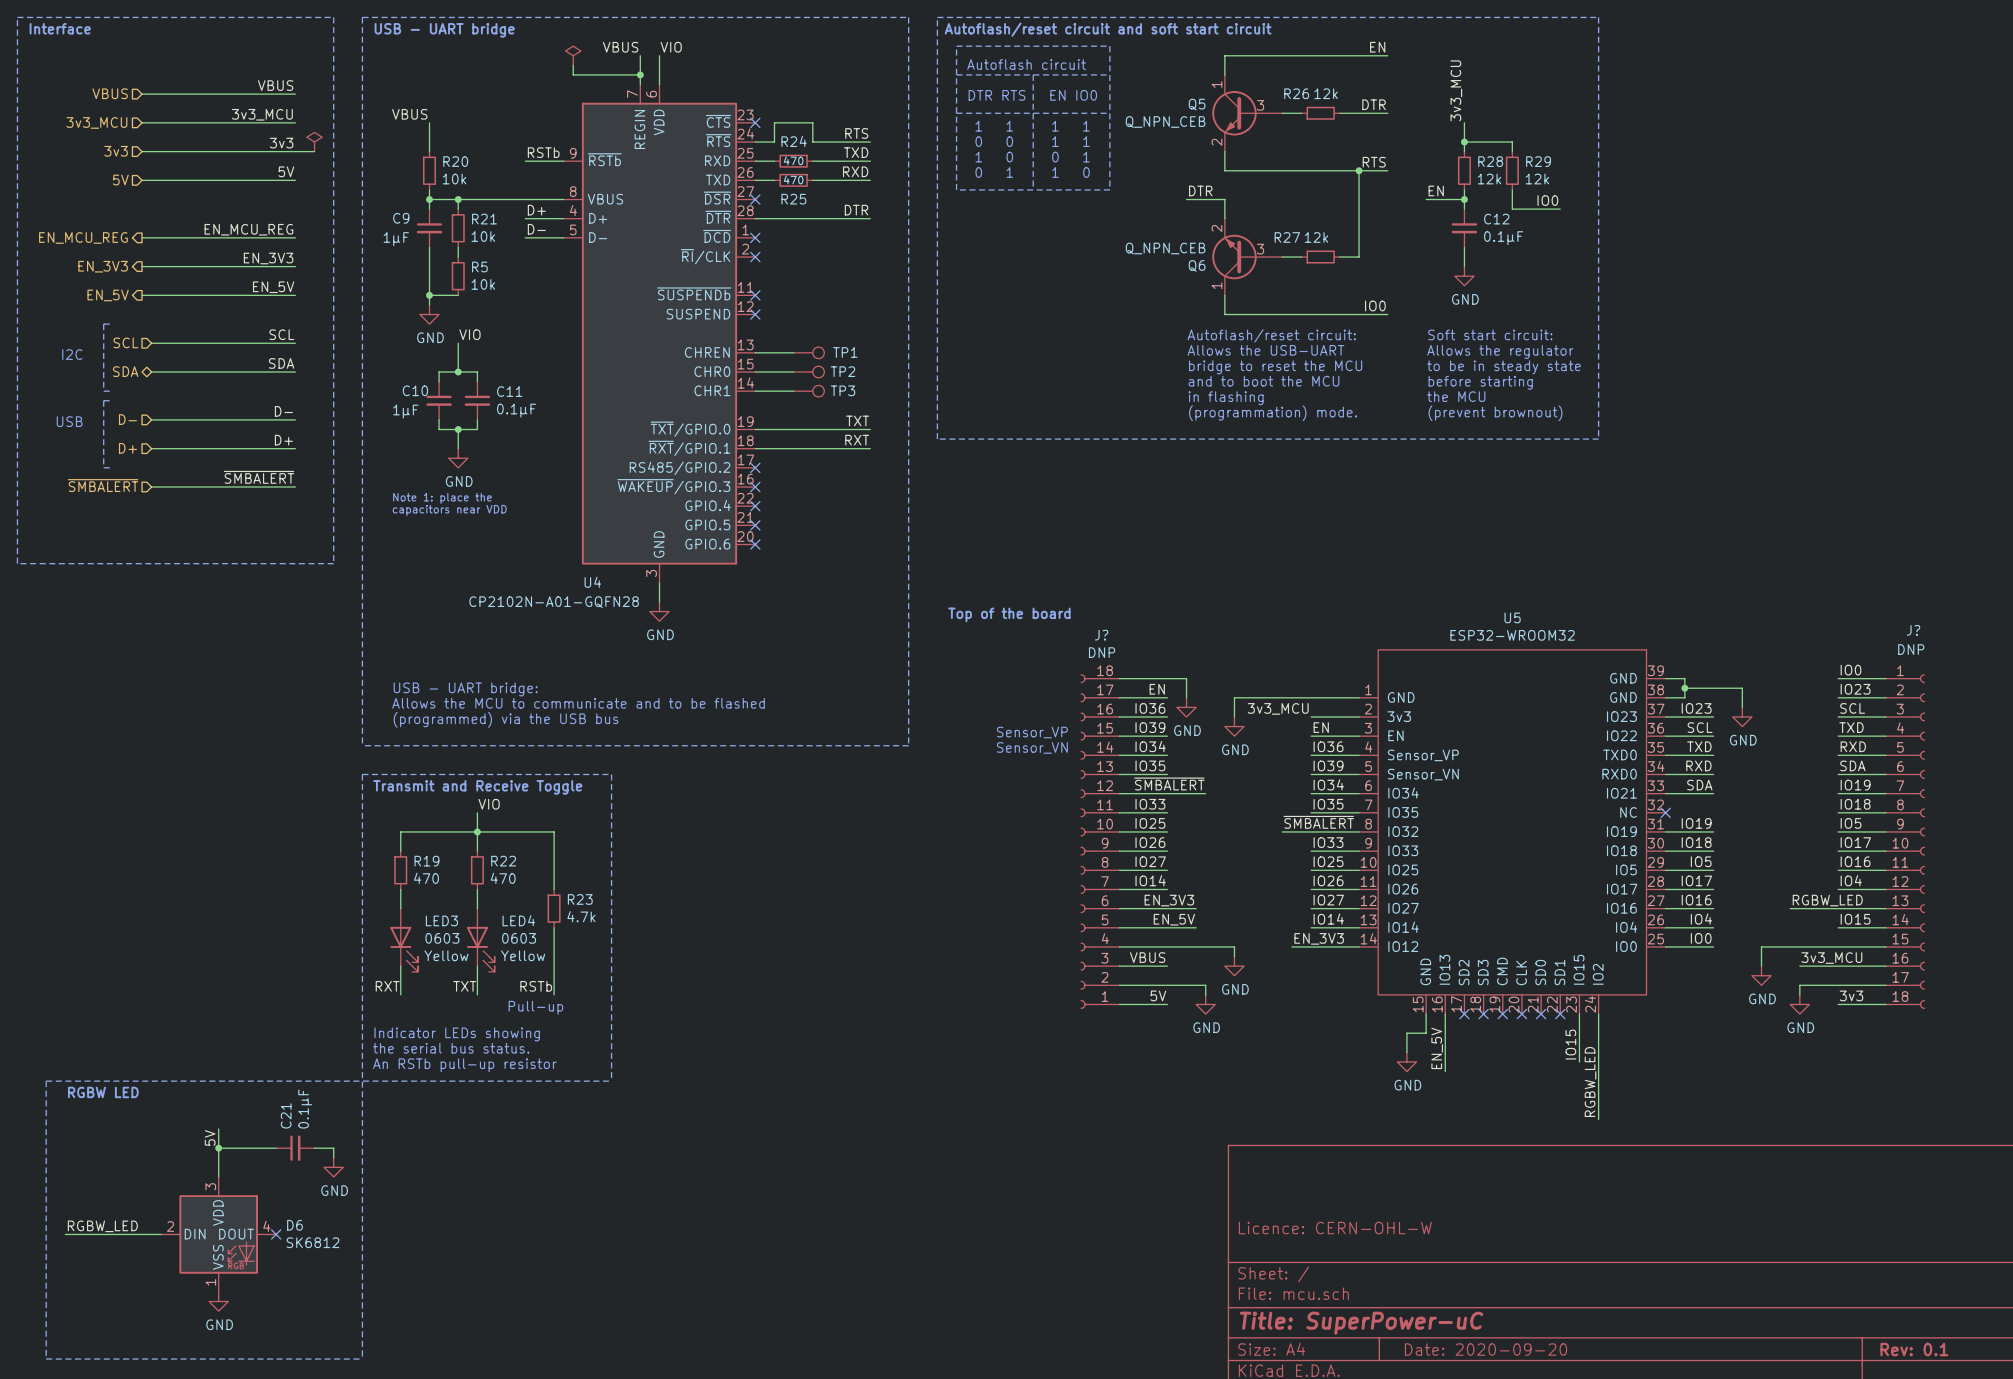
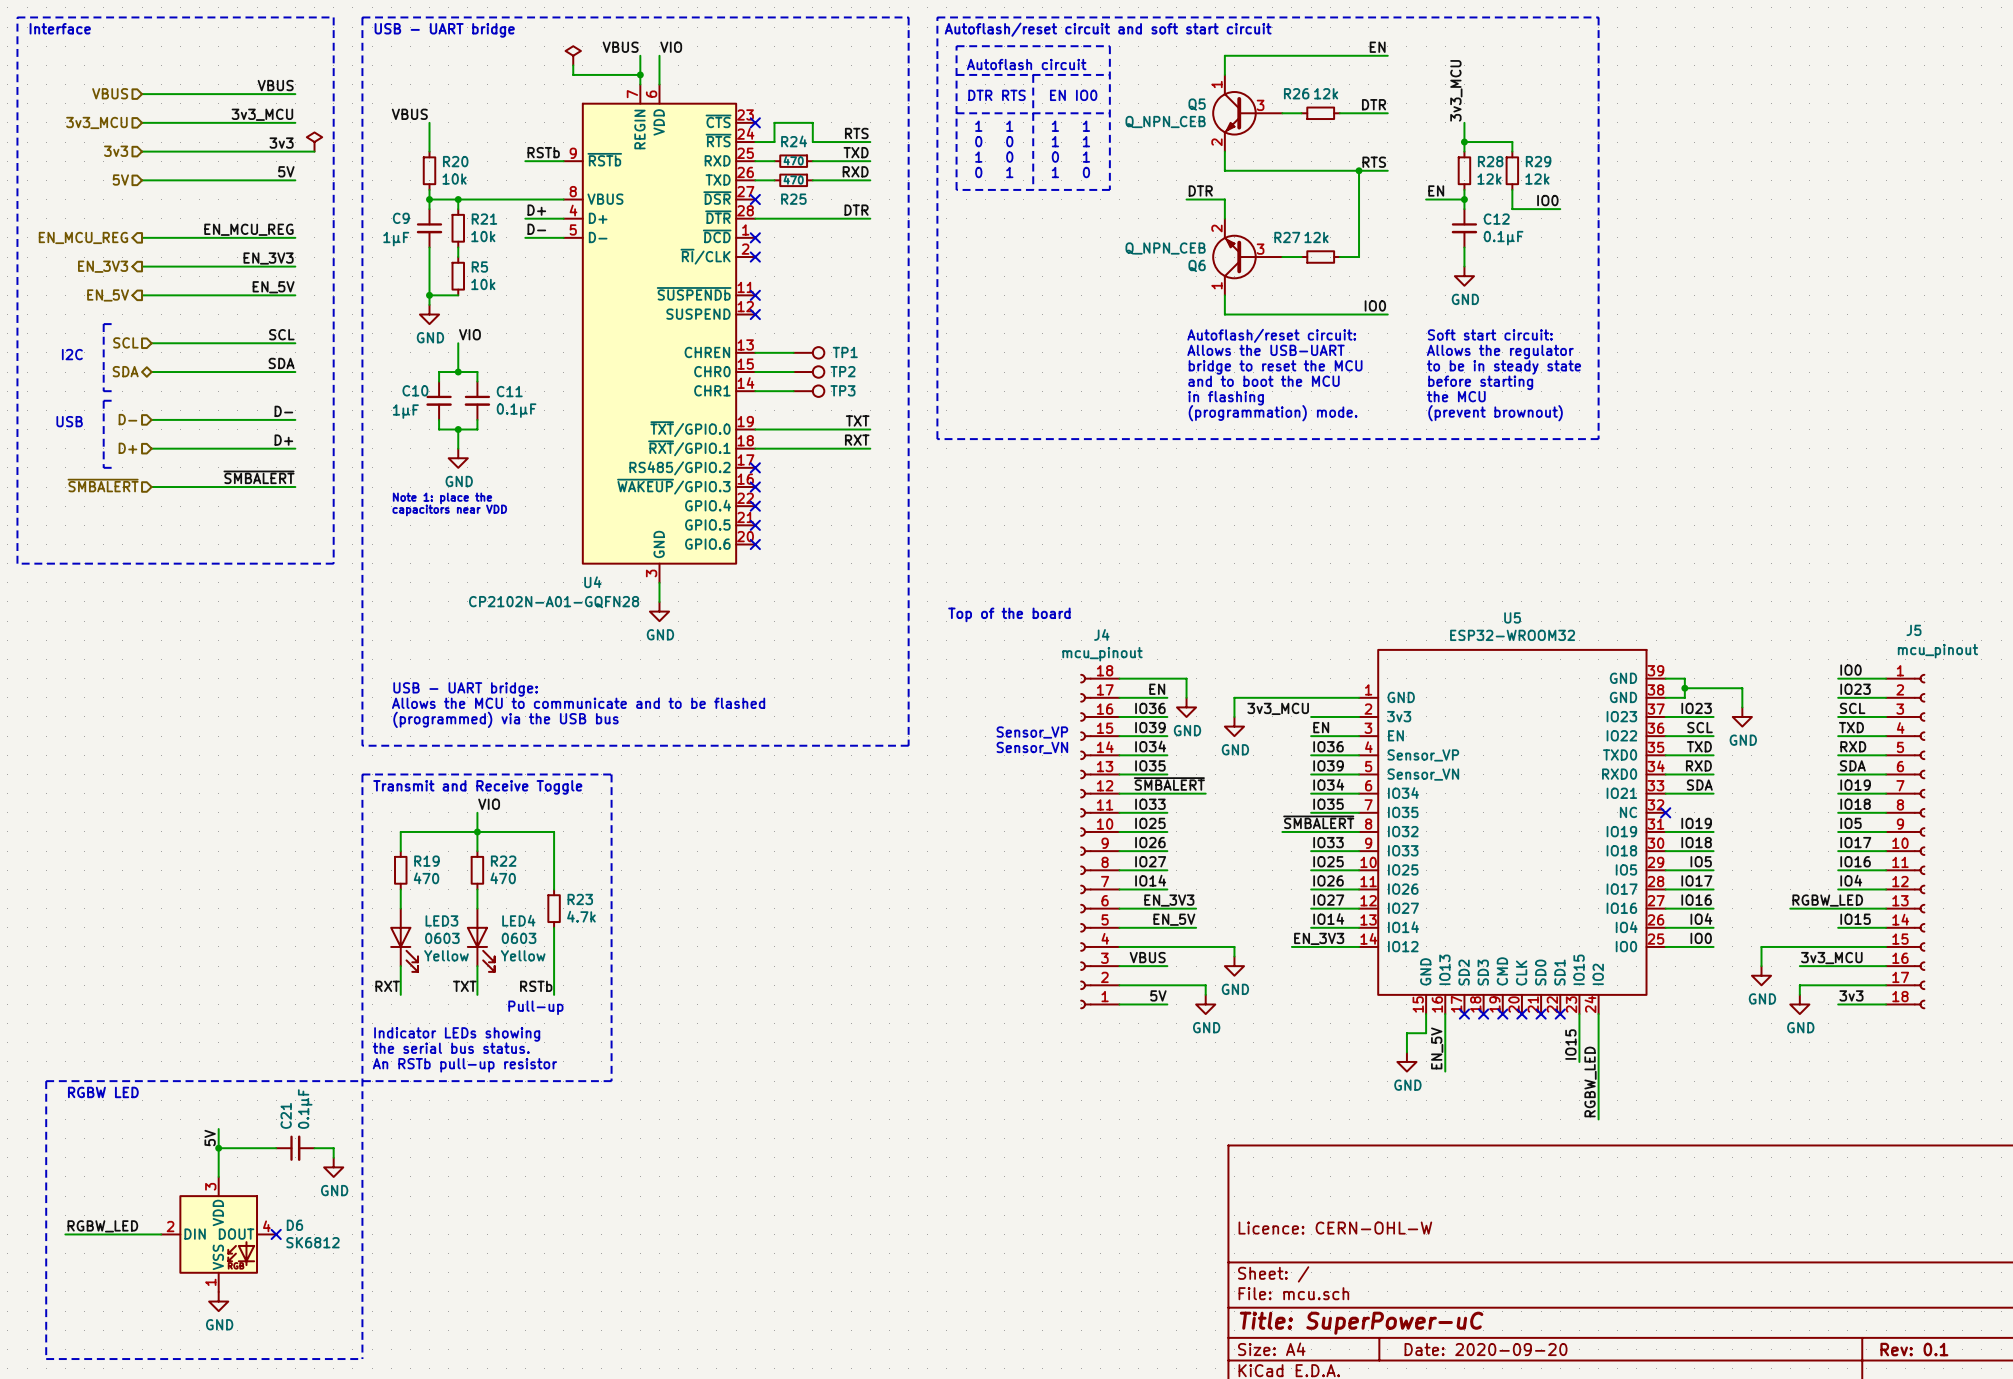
J? name: J? (1913, 630) -> J5 (1913, 630)
J? name: J? (1101, 635) -> J4 (1101, 634)
J? value: DNP (1911, 649) -> mcu_pinout (1937, 651)
J? value: DNP (1102, 652) -> mcu_pinout (1102, 654)

